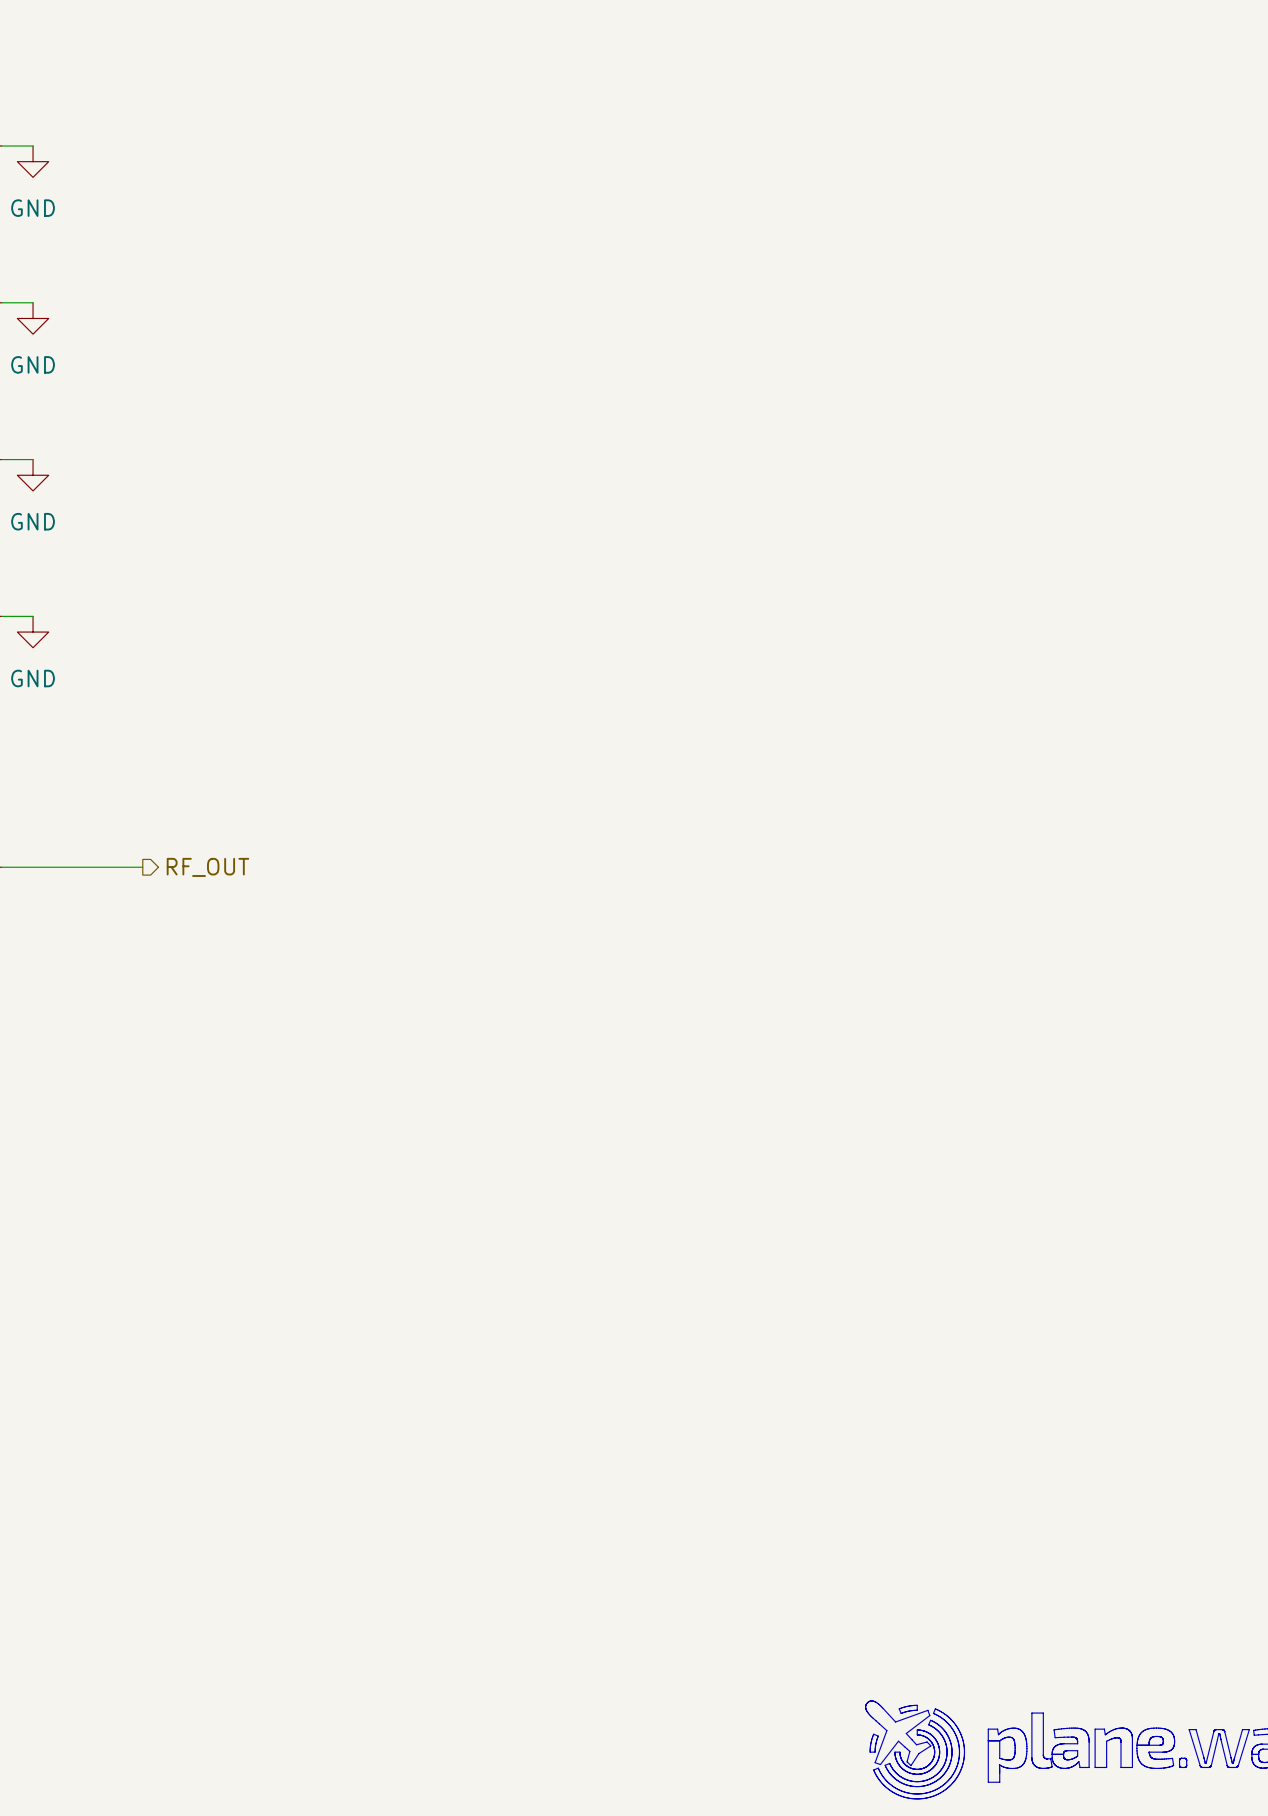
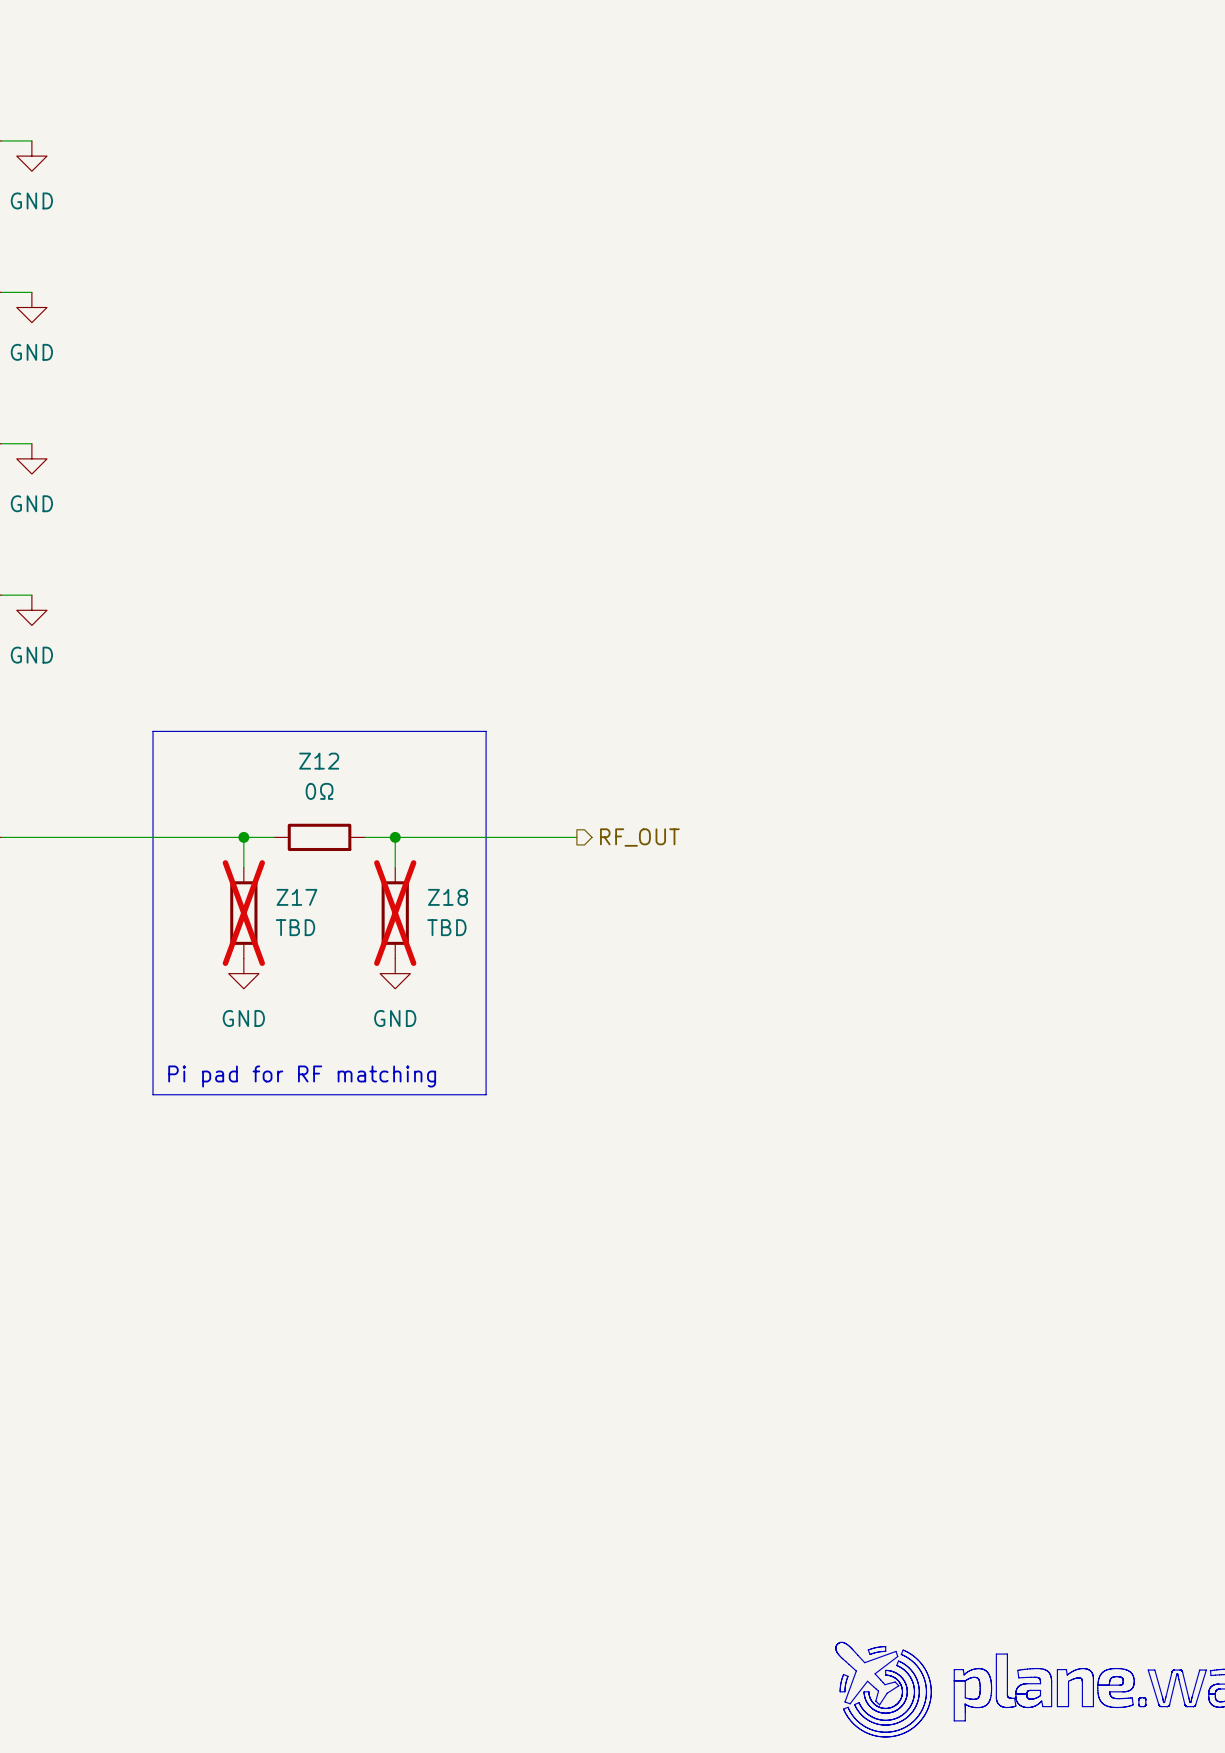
line: none -> (153, 731) (486, 731) (486, 1094) (153, 1094) (153, 731)
wire: none -> (137, 837) (274, 837)
hierarchical label: RF_OUT (207, 867) -> none
wire: none -> (243, 837) (243, 867)
junction: none -> (243, 837)
Z12: none -> 0Ω (319, 837)
wire: none -> (364, 837) (576, 837)
wire: none -> (395, 837) (395, 867)
junction: none -> (395, 837)
hierarchical label: none -> RF_OUT (639, 837)
Z17: none -> TBD (243, 913)
Z18: none -> TBD (395, 913)
power symbol: none -> GND (243, 973)
power symbol: none -> GND (395, 973)
text: none -> Pi pad for RF matching (302, 1076)

